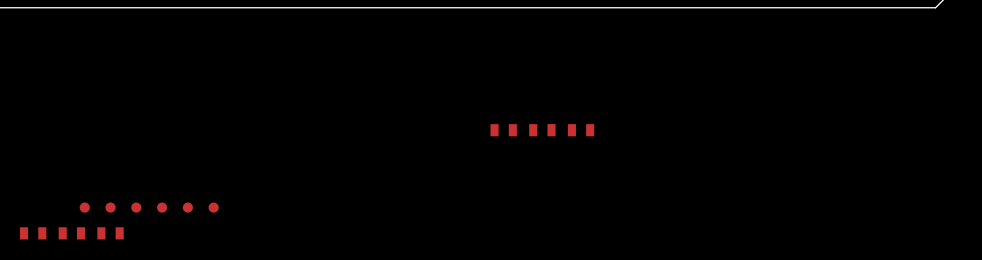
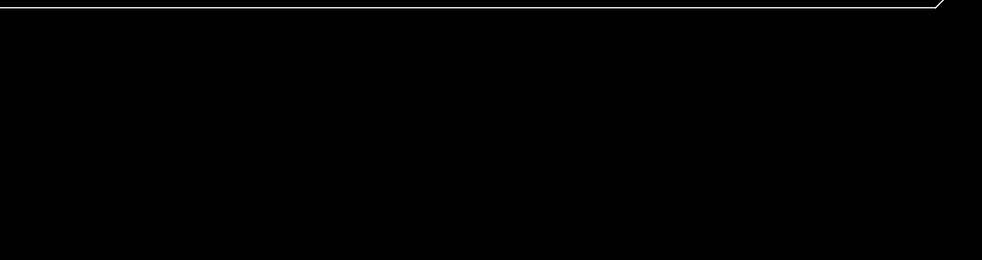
part: (503, 130) -> none
part: (542, 130) -> none
part: (581, 130) -> none
part: (84, 207) -> none
part: (110, 207) -> none
part: (136, 207) -> none
part: (162, 207) -> none
part: (187, 207) -> none
part: (213, 207) -> none
part: (33, 233) -> none
part: (71, 233) -> none
part: (110, 233) -> none

